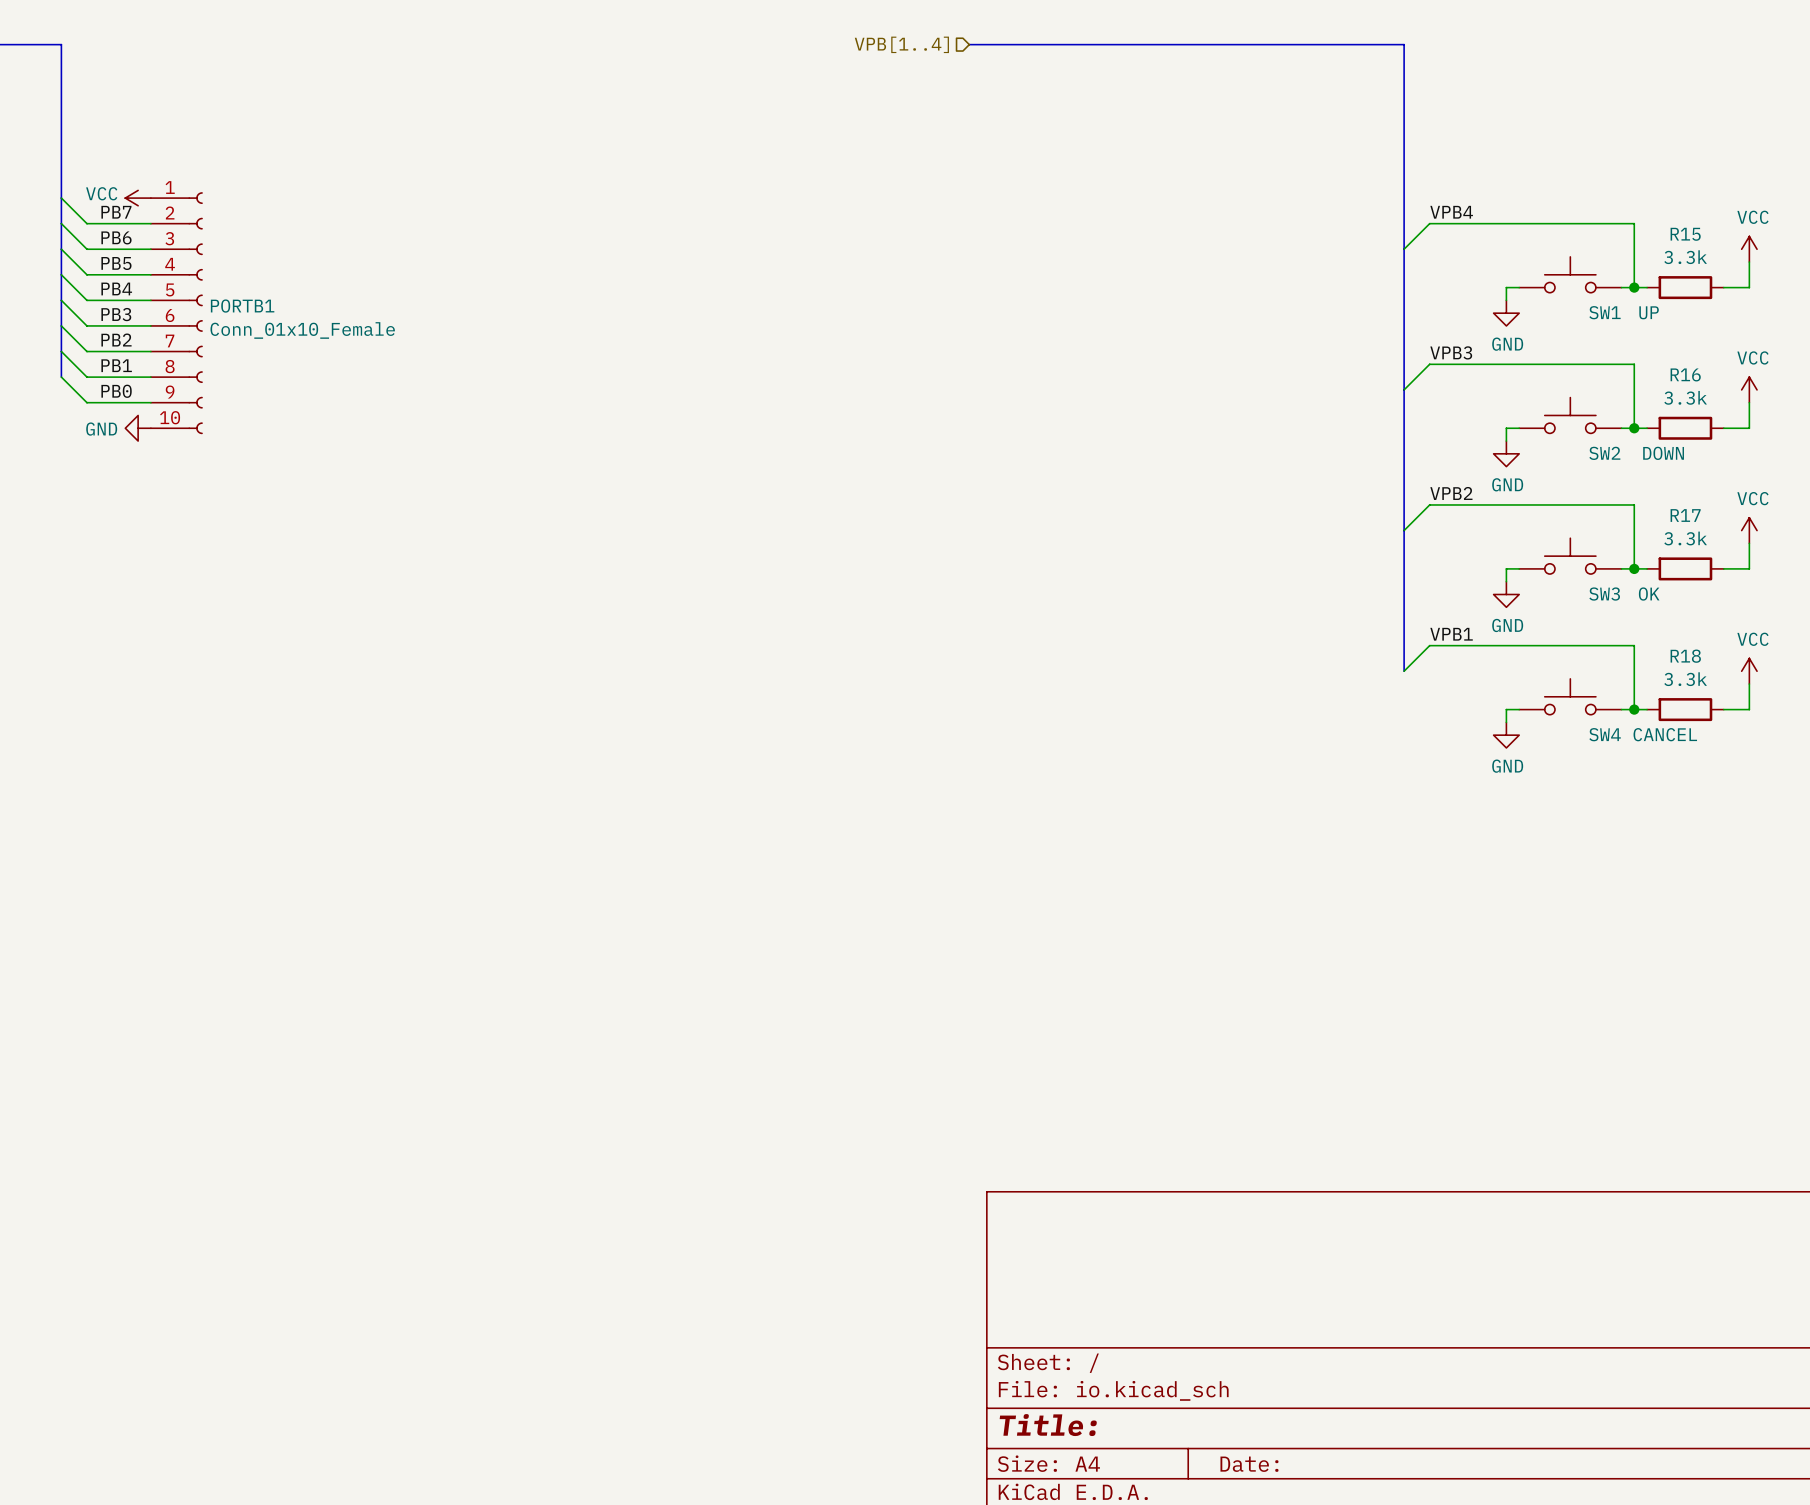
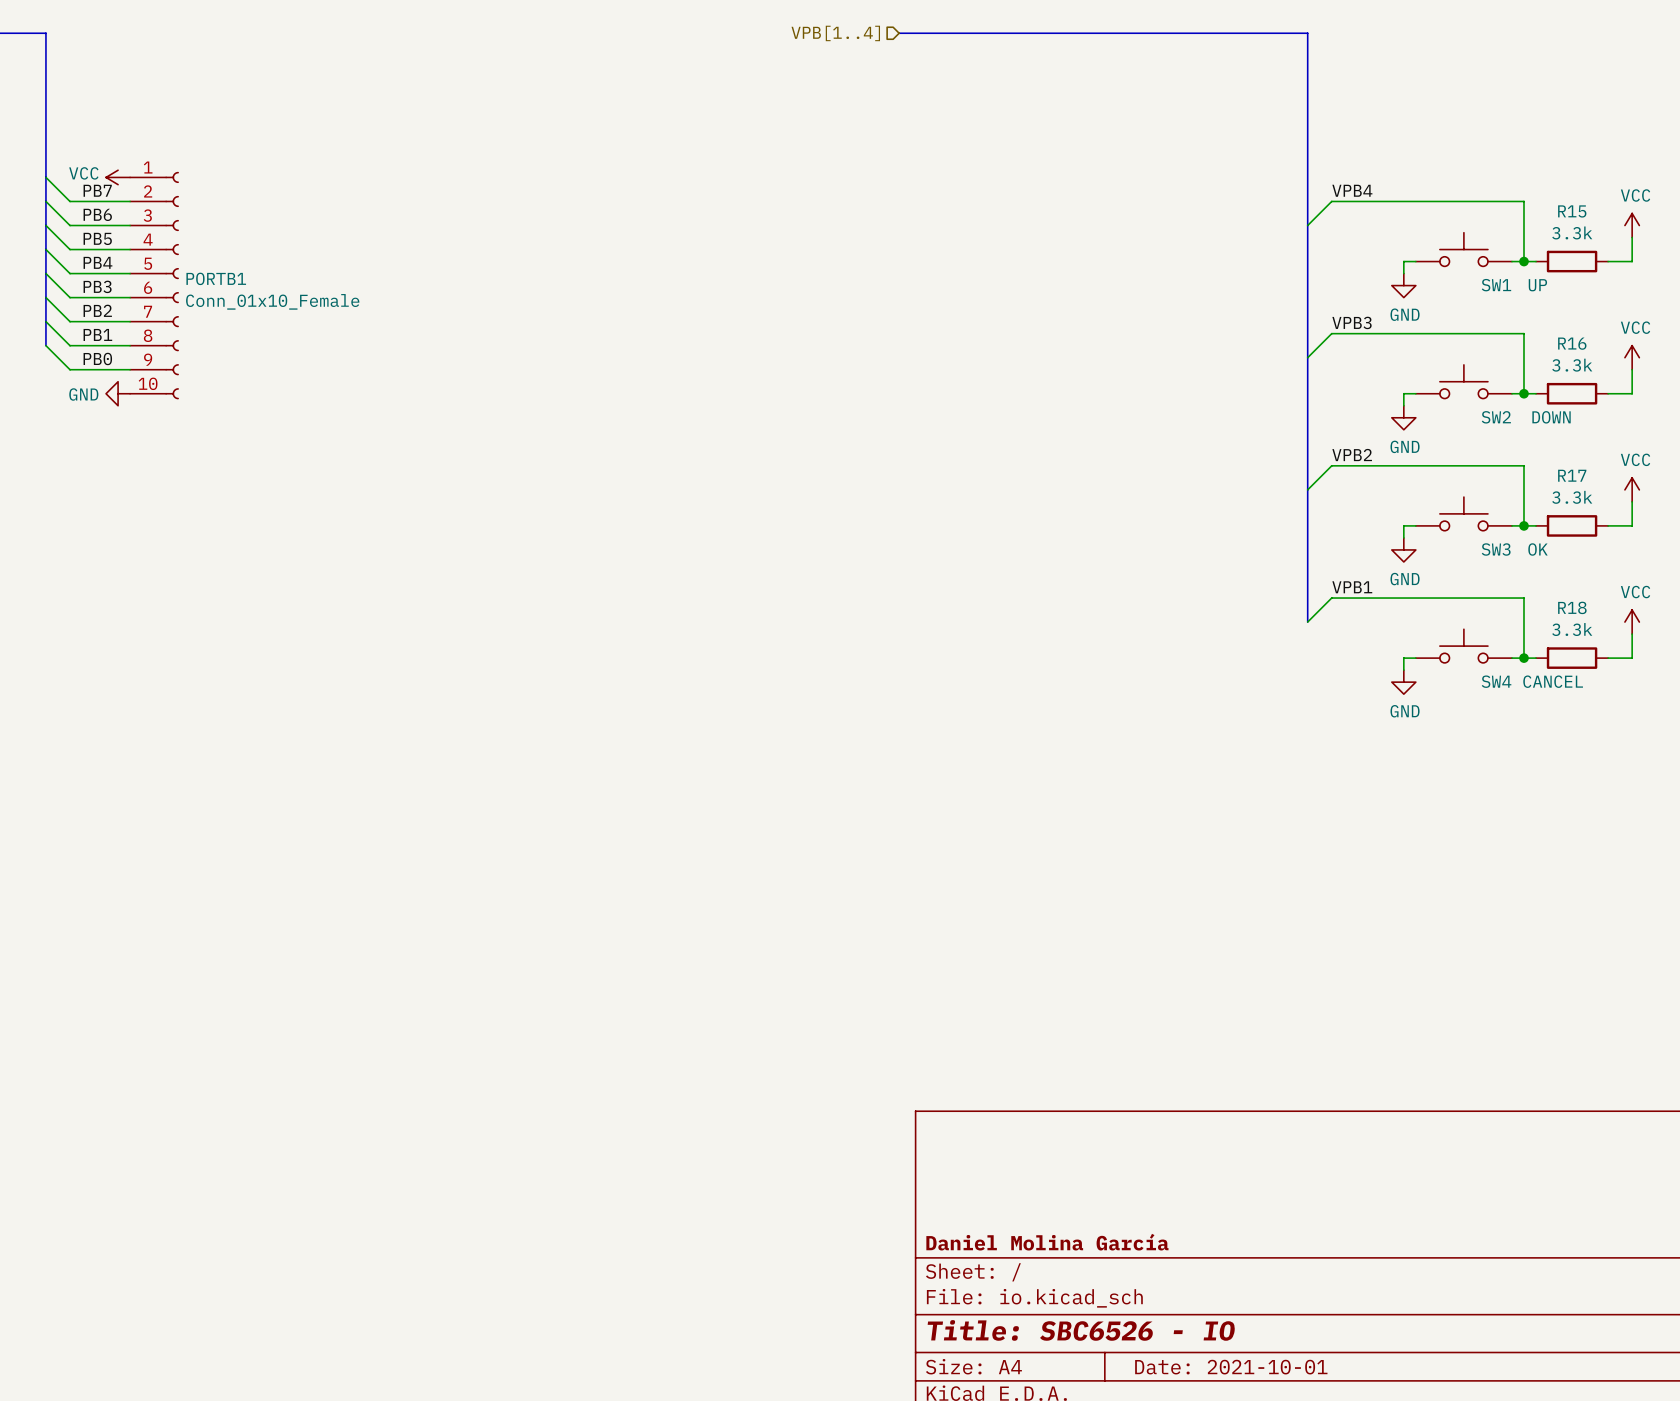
title block: none -> Daniel Molina García (1047, 1242)
title block: Title: (1048, 1425) -> Title: SBC6526 - IO (1081, 1330)
title block: Date: (1249, 1464) -> Date: 2021-10-01 (1231, 1367)

